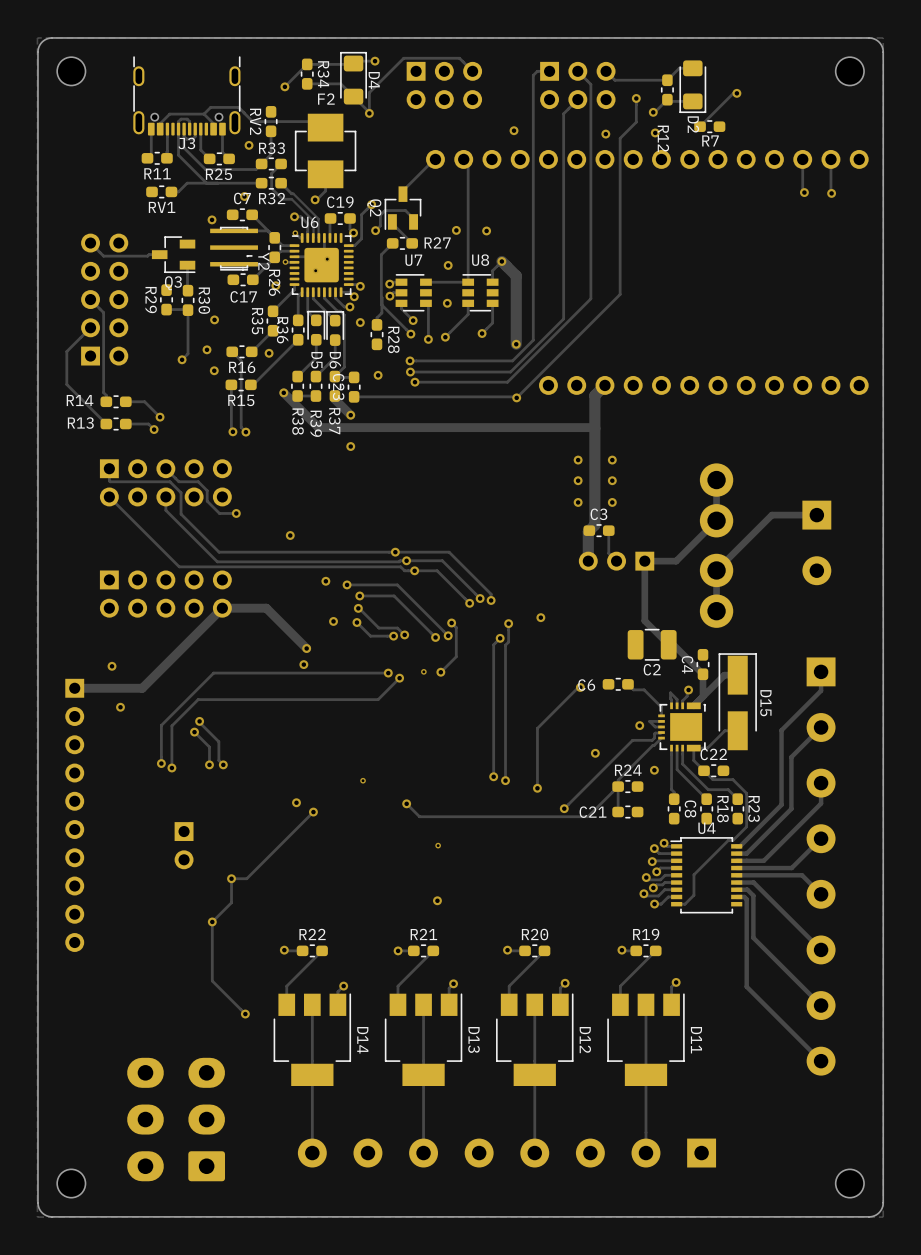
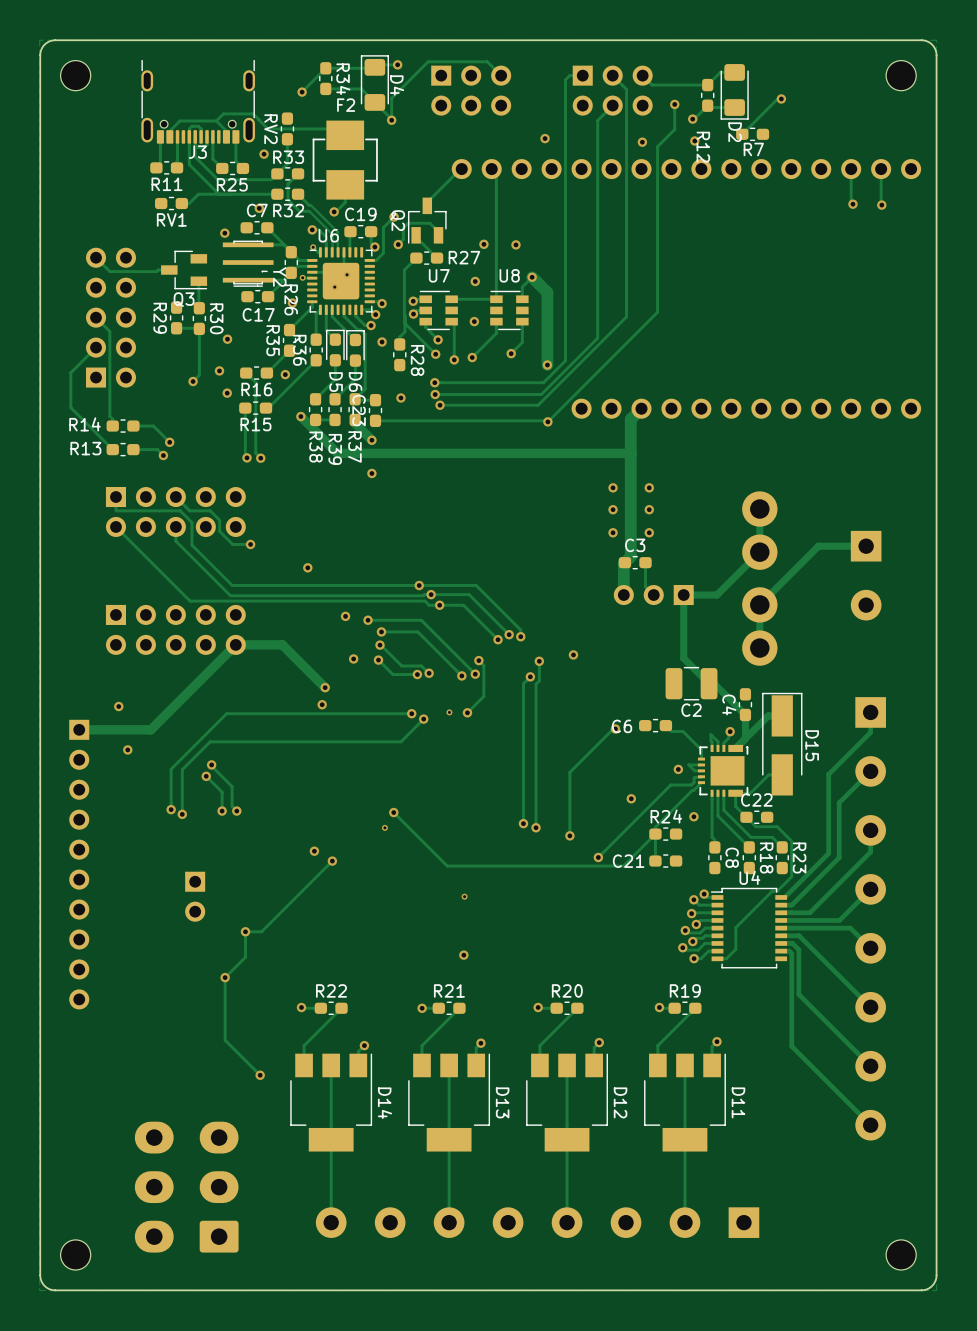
track: (406, 803) (421, 816) -> (393, 812) (447, 866)
via position: (406, 803) -> (393, 812)

